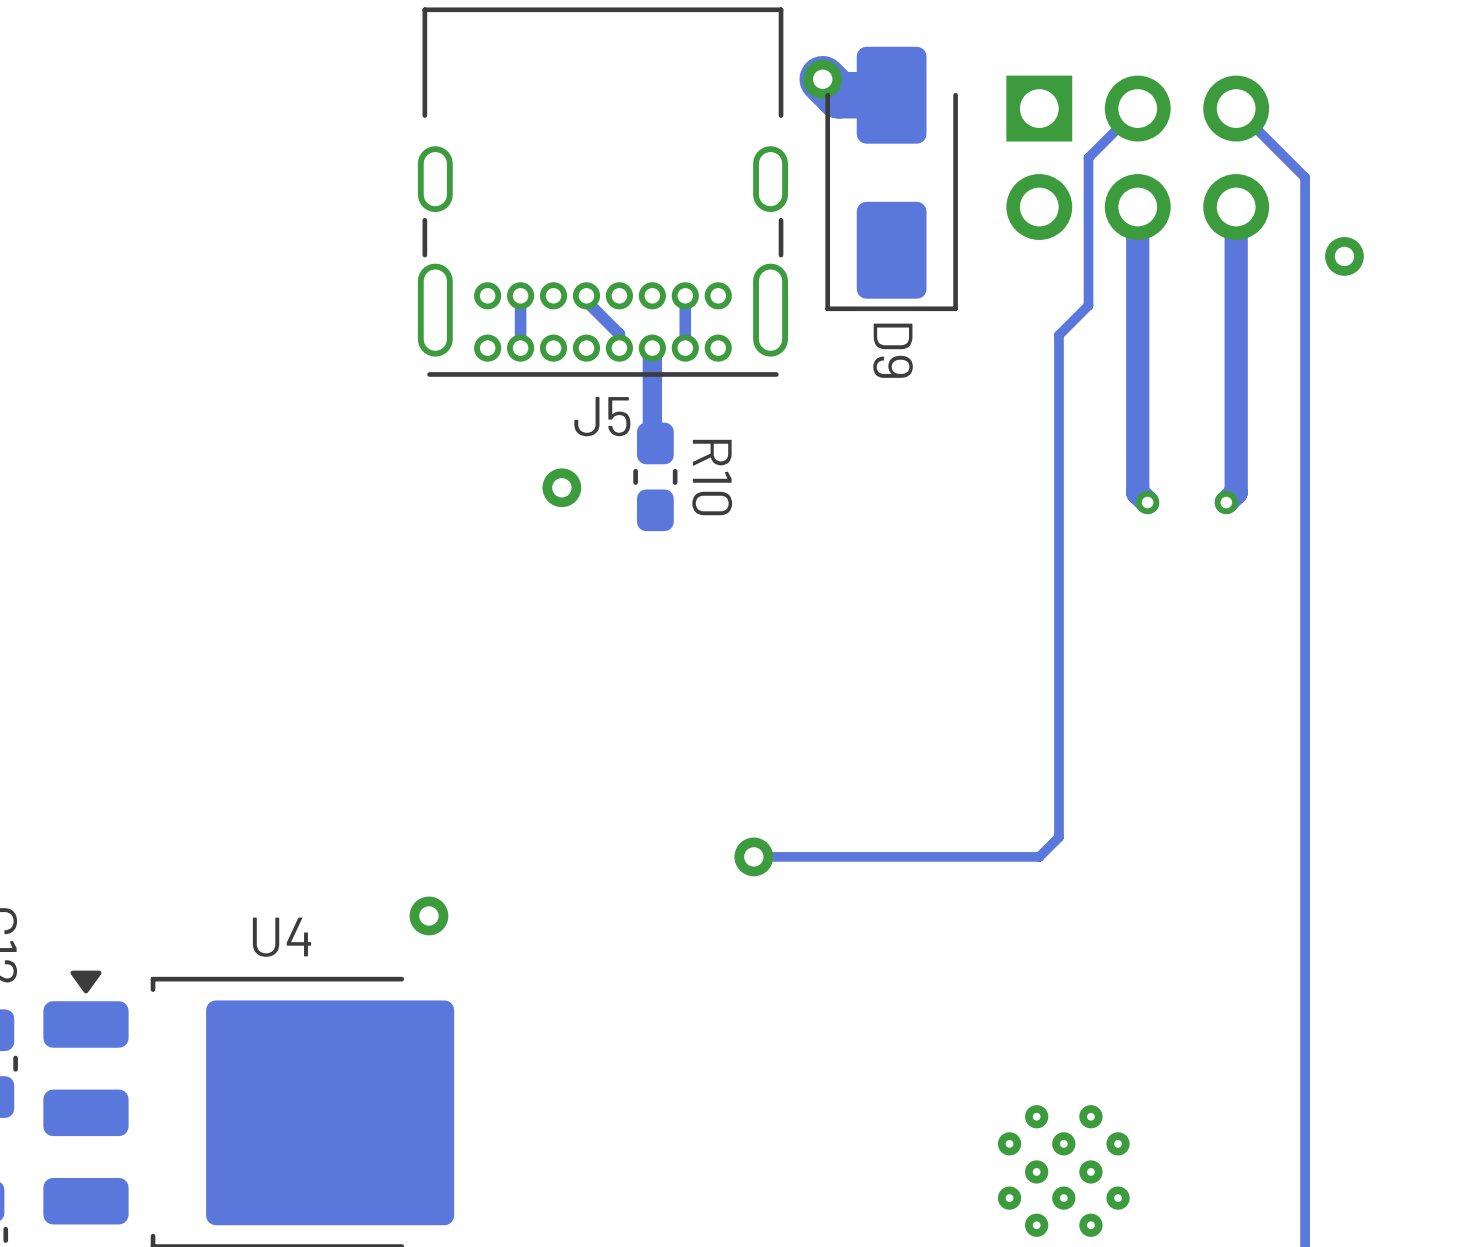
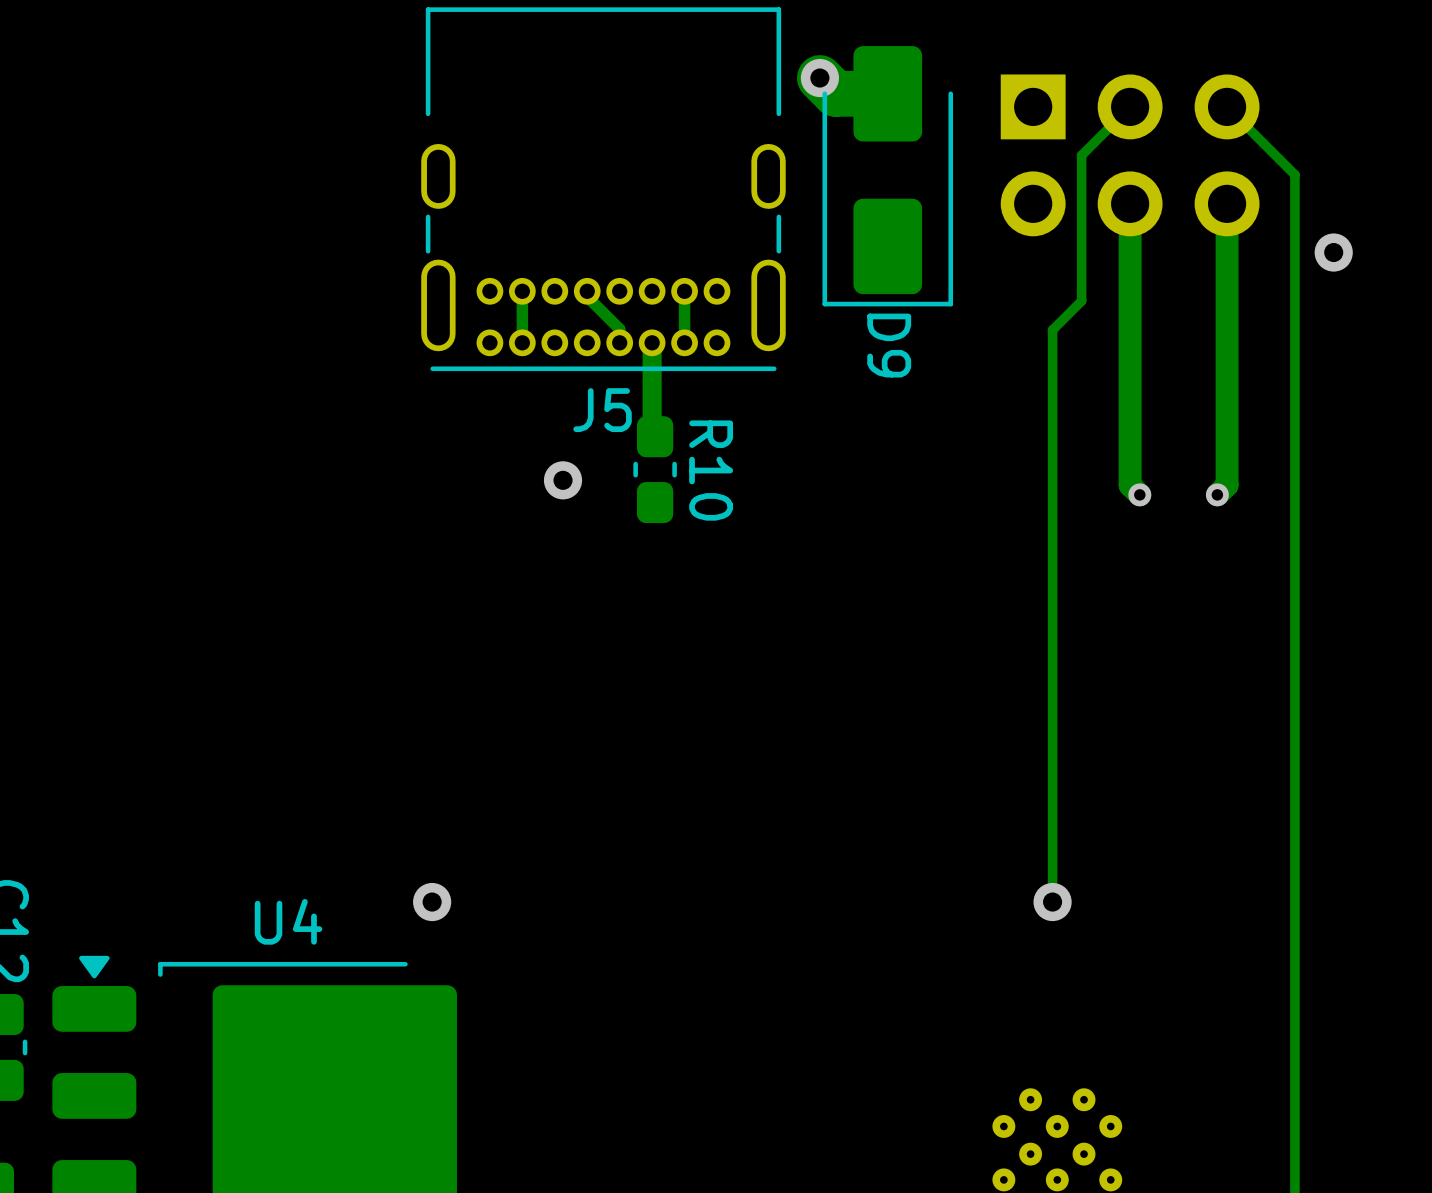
track: (1058, 837) (1039, 856) (753, 856) -> (1052, 824) (1052, 902)
via: (753, 856) -> none
via: none -> (1052, 902)

